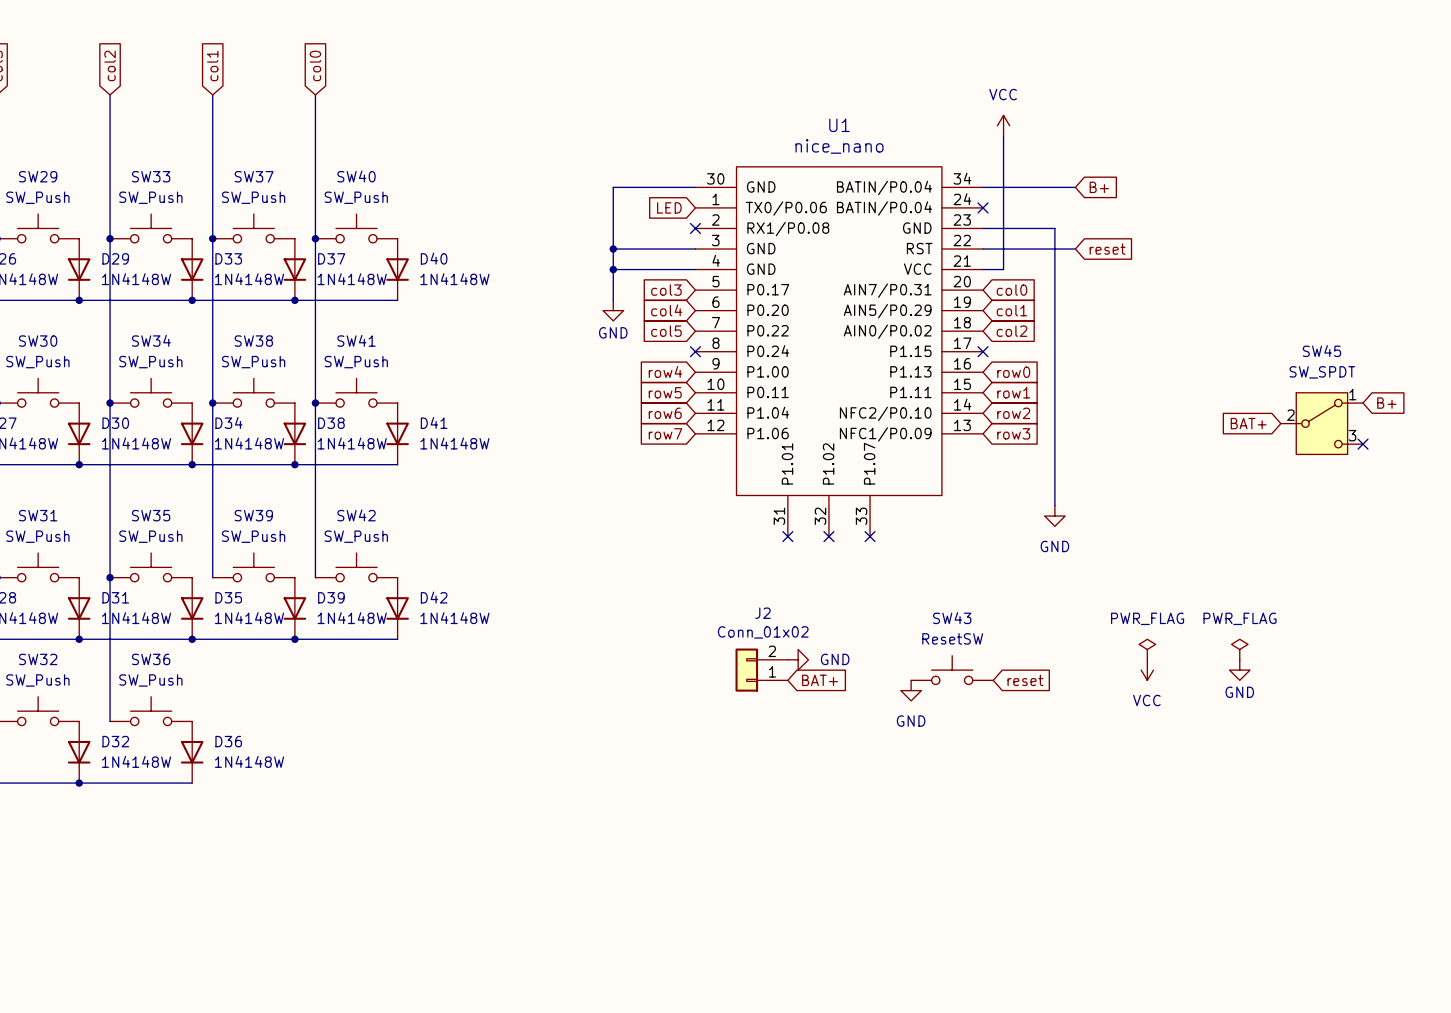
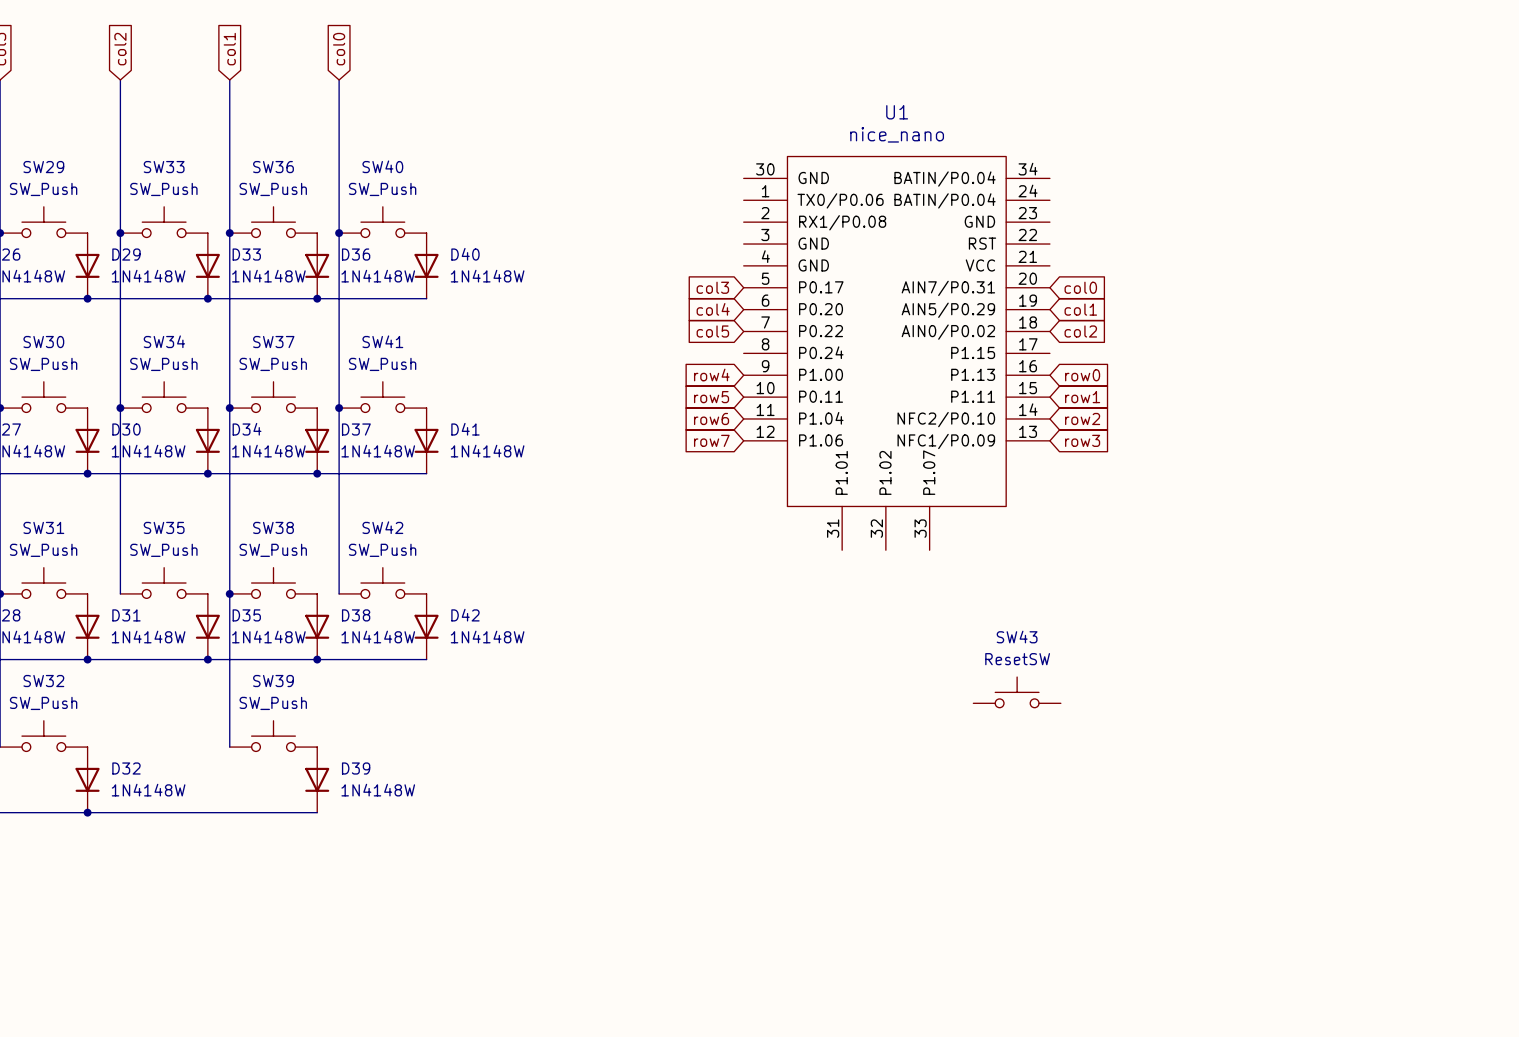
power symbol: VCC (1003, 125) -> none
wire: (1003, 136) (1003, 269) (983, 269) -> none
SW37 name: SW37 (254, 176) -> SW36 (273, 167)
wire: (695, 187) (613, 187) (613, 300) -> none
wire: (983, 187) (1075, 187) -> none
global label: B+ (1099, 187) -> none
global label: LED (669, 207) -> none
no-connect mark: (983, 207) -> none
no-connect mark: (695, 228) -> none
wire: (983, 228) (1054, 228) (1054, 505) -> none
wire: (613, 249) (695, 249) -> none
junction: (613, 249) -> none
wire: (983, 249) (1075, 249) -> none
global label: reset (1107, 249) -> none
D37 name: D37 (331, 258) -> D36 (356, 254)
wire: (613, 269) (695, 269) -> none
junction: (613, 269) -> none
power symbol: GND (613, 310) -> none
SW38 name: SW38 (253, 341) -> SW37 (273, 342)
no-connect mark: (695, 351) -> none
no-connect mark: (983, 351) -> none
global label: B+ (1386, 403) -> none
D38 name: D38 (331, 423) -> D37 (356, 429)
global label: BAT+ (1248, 423) -> none
SW45: SW_SPDT (1321, 423) -> none
no-connect mark: (1363, 444) -> none
SW39 name: SW39 (253, 515) -> SW38 (273, 527)
power symbol: GND (1054, 516) -> none
no-connect mark: (787, 536) -> none
no-connect mark: (828, 536) -> none
no-connect mark: (870, 536) -> none
wire: (110, 577) (110, 721) -> (229, 593) (229, 747)
junction: (110, 577) -> none
junction: none -> (229, 593)
D39 name: D39 (331, 597) -> D38 (356, 615)
power symbol: PWR_FLAG (1147, 649) -> none
power symbol: PWR_FLAG (1239, 649) -> none
power symbol: GND (798, 659) -> none
J2: Conn_01x02 (761, 670) -> none
power symbol: VCC (1147, 670) -> none
power symbol: GND (1239, 670) -> none
global label: BAT+ (820, 680) -> none
global label: reset (1025, 680) -> none
power symbol: GND (911, 690) -> none
SW36: SW_Push (151, 711) -> none
SW39: none -> SW_Push (273, 736)
D36: 1N4148W (192, 752) -> none
D39: none -> 1N4148W (317, 779)
wire: none -> (207, 812) (317, 812)

